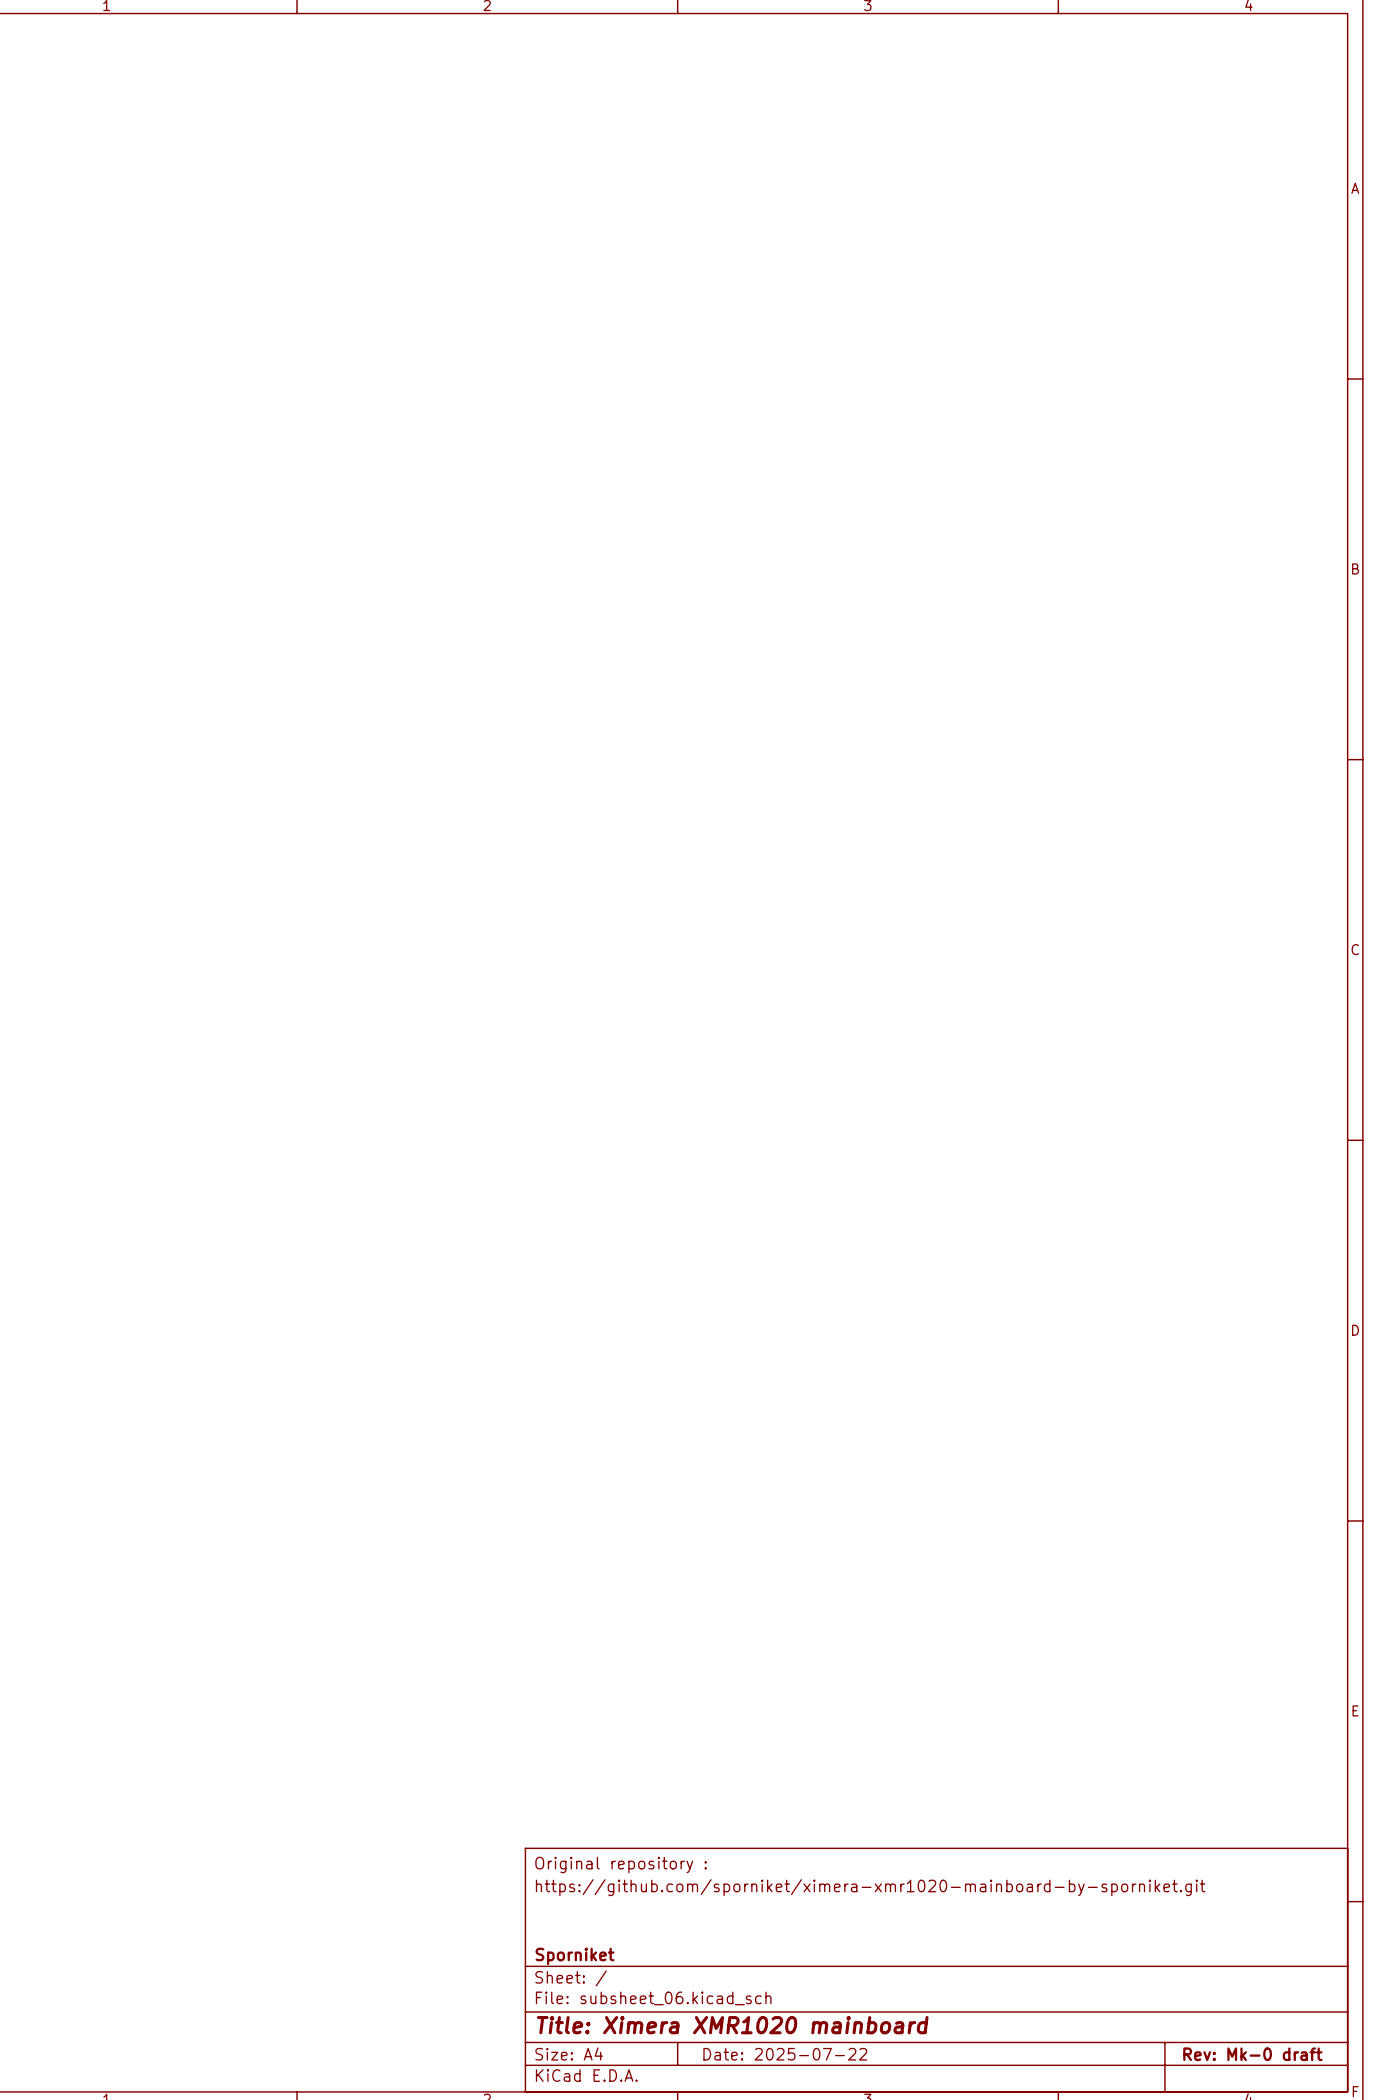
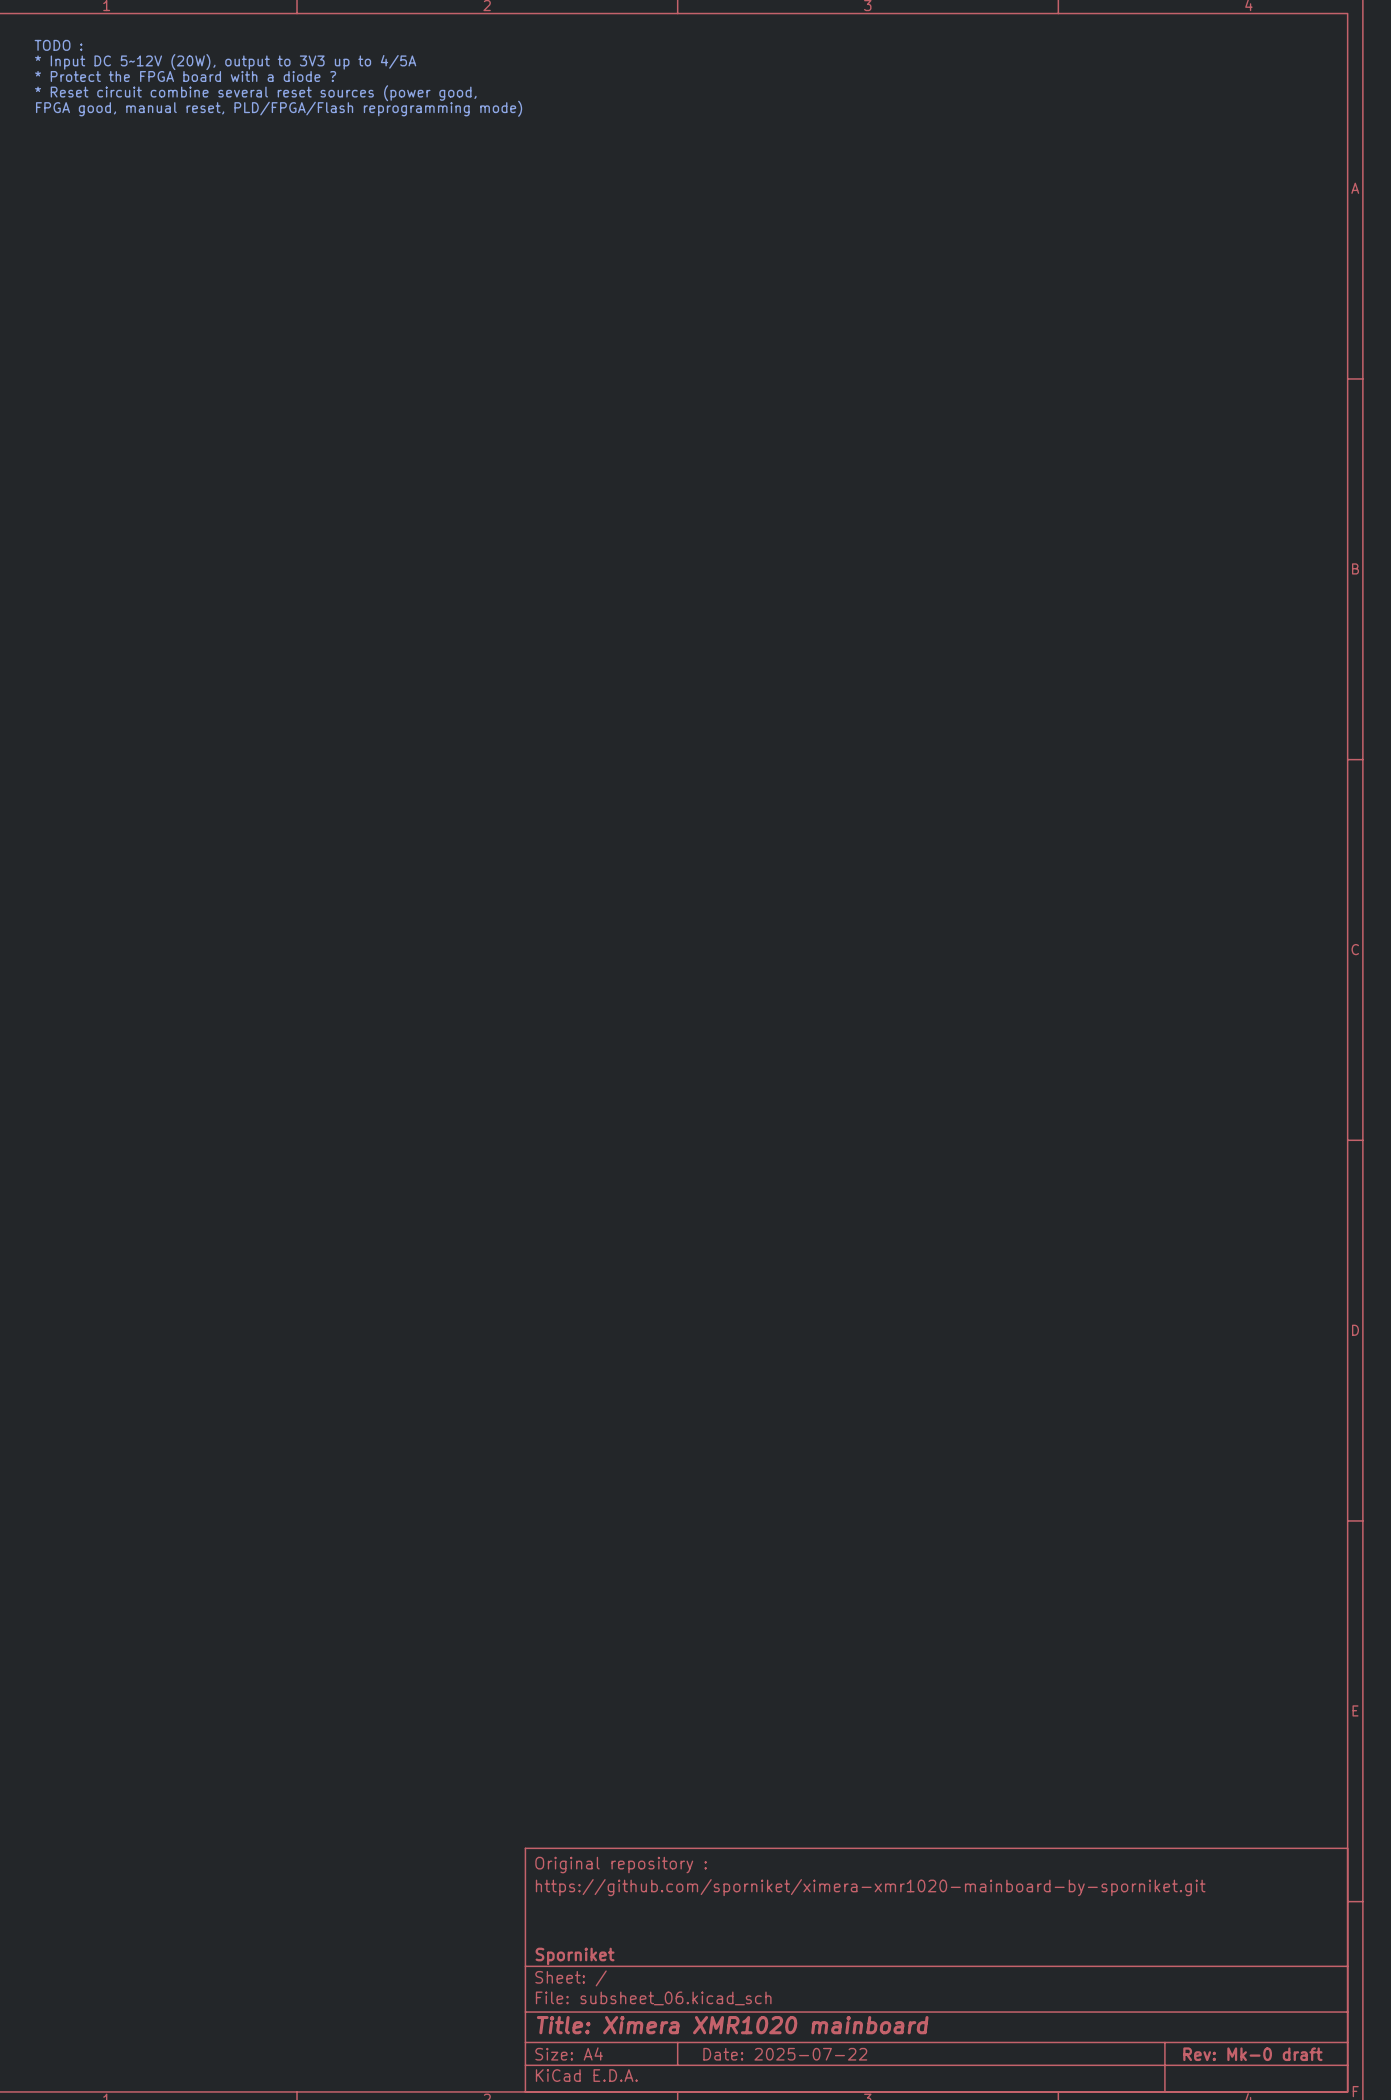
text: none -> TODO : (58, 45)
text: none -> * Input DC 5~12V (20W), output to 3V3 up to 4/5A (225, 62)
text: none -> * Protect the FPGA board with a diode ? (185, 76)
text: none -> * Reset circuit combine several reset sources (power good, (255, 93)
text: none -> FPGA good, manual reset, PLD/FPGA/Flash reprogramming mode) (279, 108)

